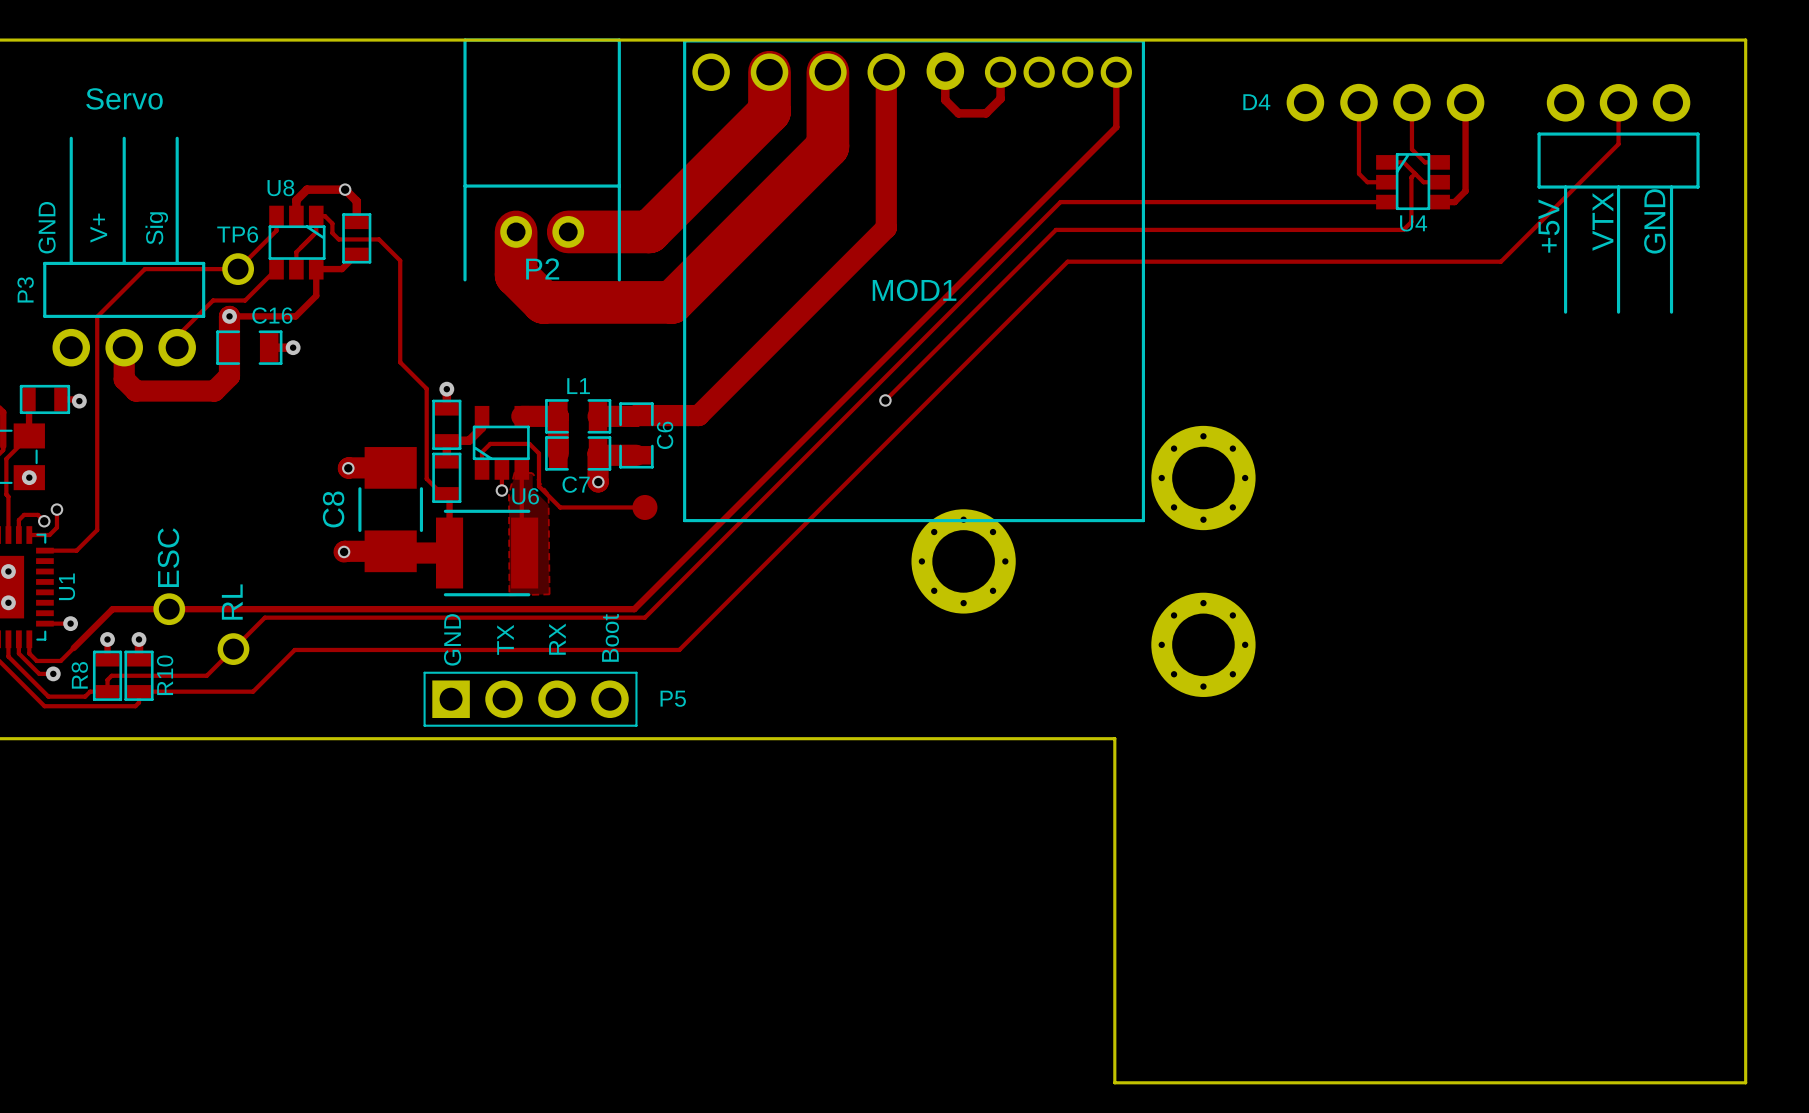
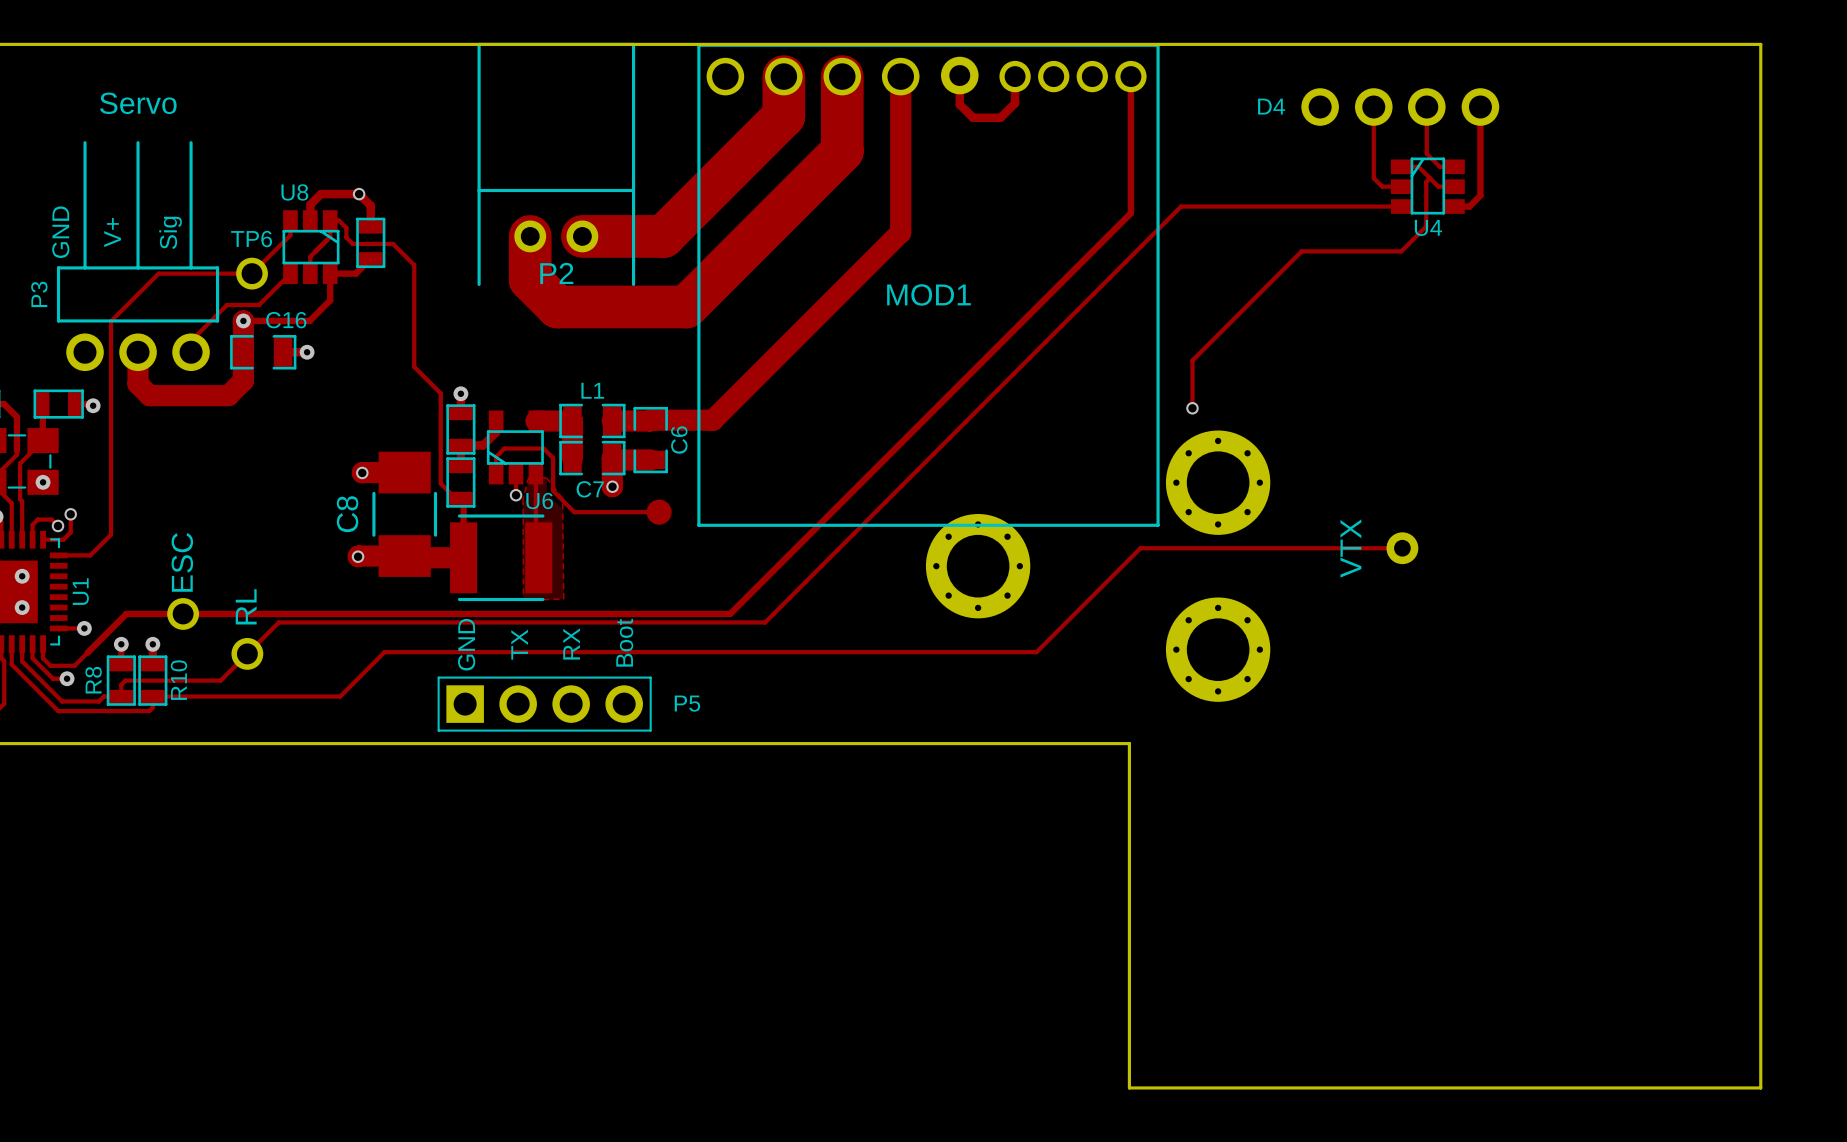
track: (1618, 102) (1618, 144) (1500, 261) (1067, 261) (679, 649) (294, 649) (253, 691) -> (1402, 548) (1140, 548) (1036, 652) (384, 652) (340, 696) (267, 696)
track: (1116, 127) (634, 609) -> (1130, 131) (1130, 213) (730, 613) (648, 613)
part: (1618, 198) -> none
track: (1166, 202) (1060, 202) (644, 617) -> (1181, 206) (765, 622) (659, 622)
text position: VTX (1602, 221) -> VTX (1350, 548)
text: GND (1654, 221) -> none
text: +5V (1549, 226) -> none
track: (1403, 229) (1055, 229) (885, 400) -> (1418, 234) (1401, 251) (1301, 251) (1192, 360) (1192, 408)
via: (885, 400) -> none
via: none -> (1192, 408)
part: none -> (1402, 548)

